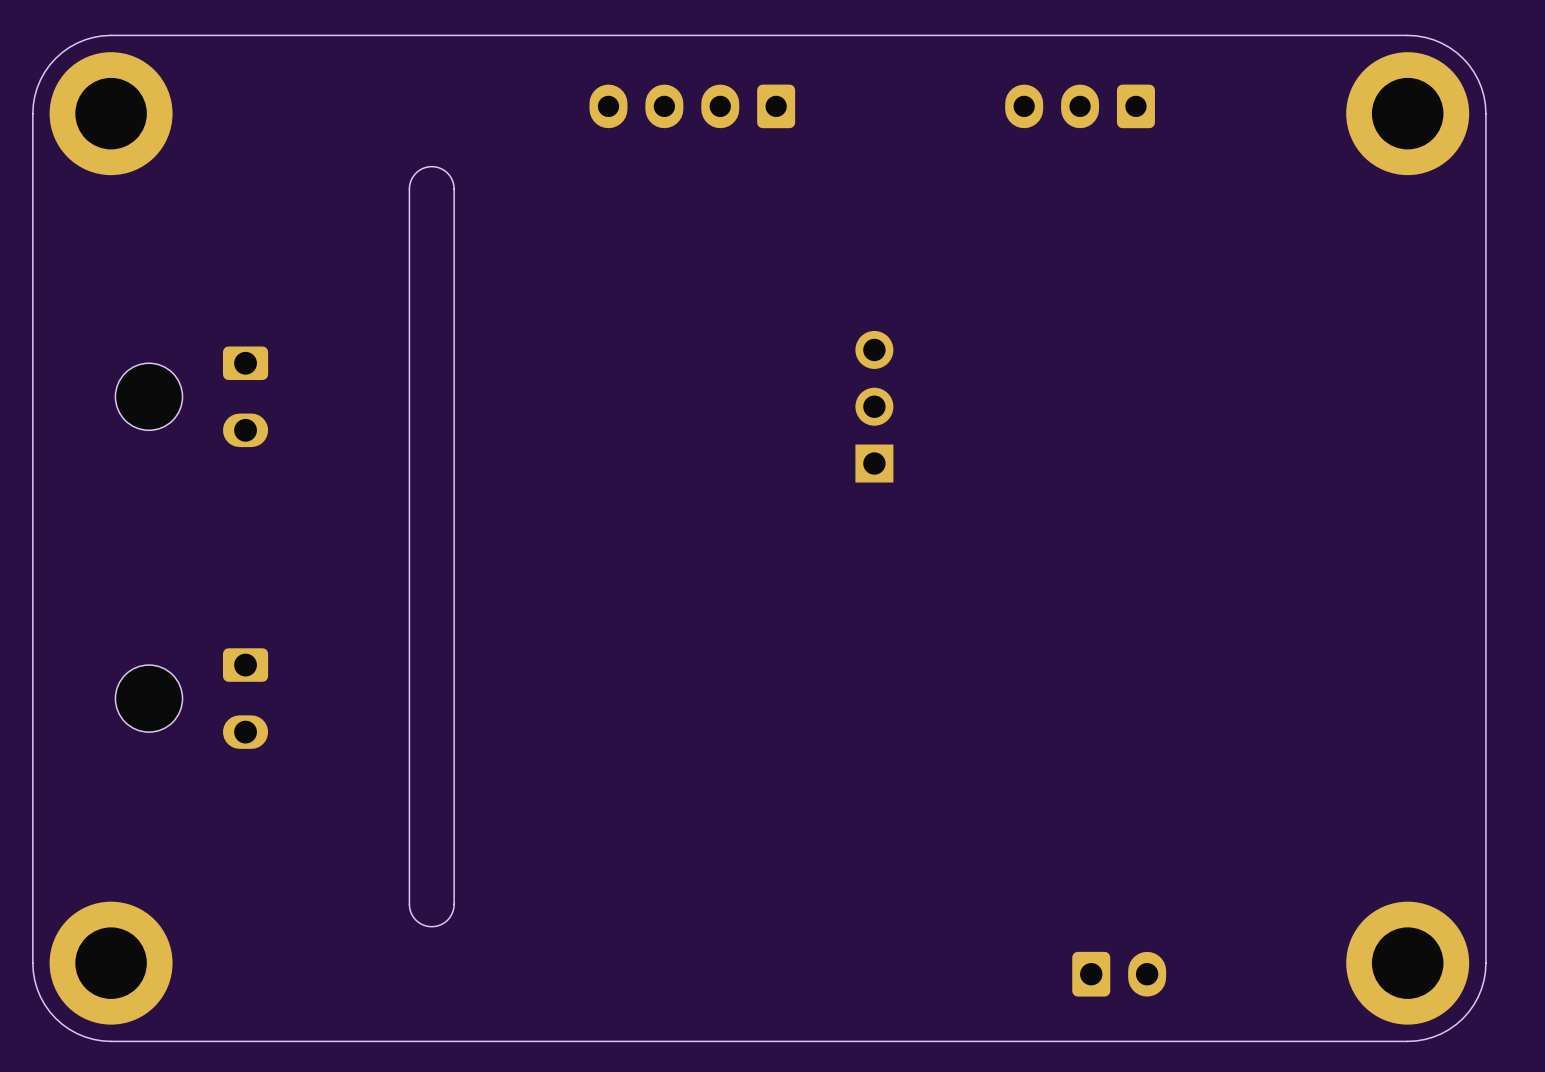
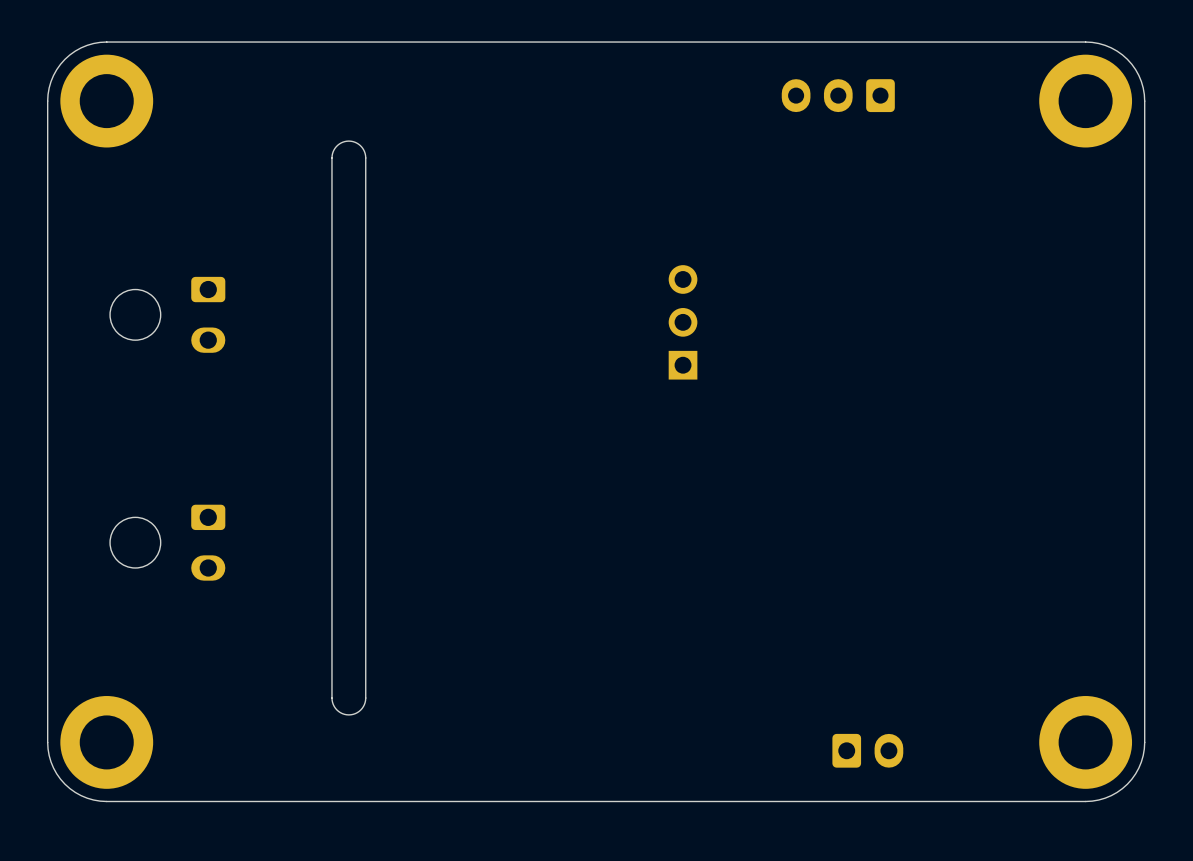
part: (692, 106) -> none

